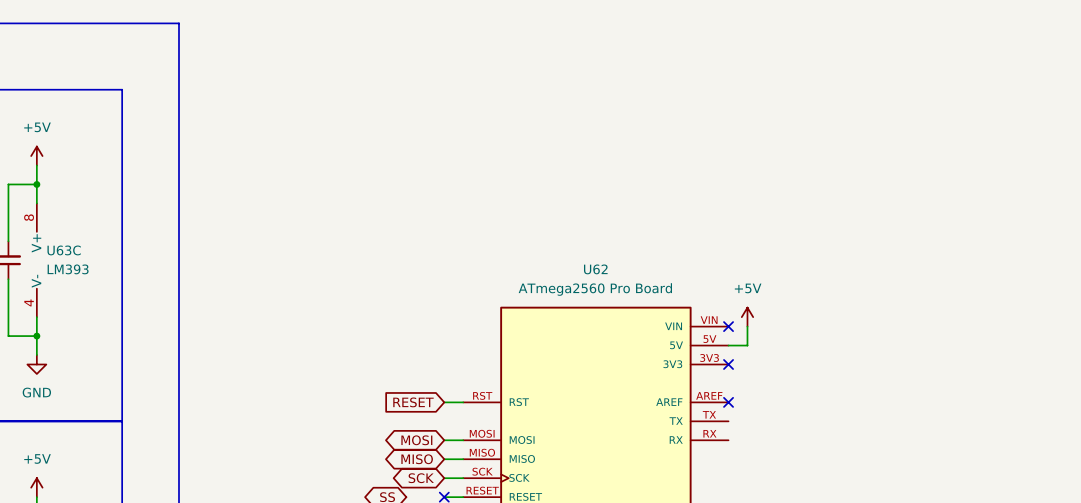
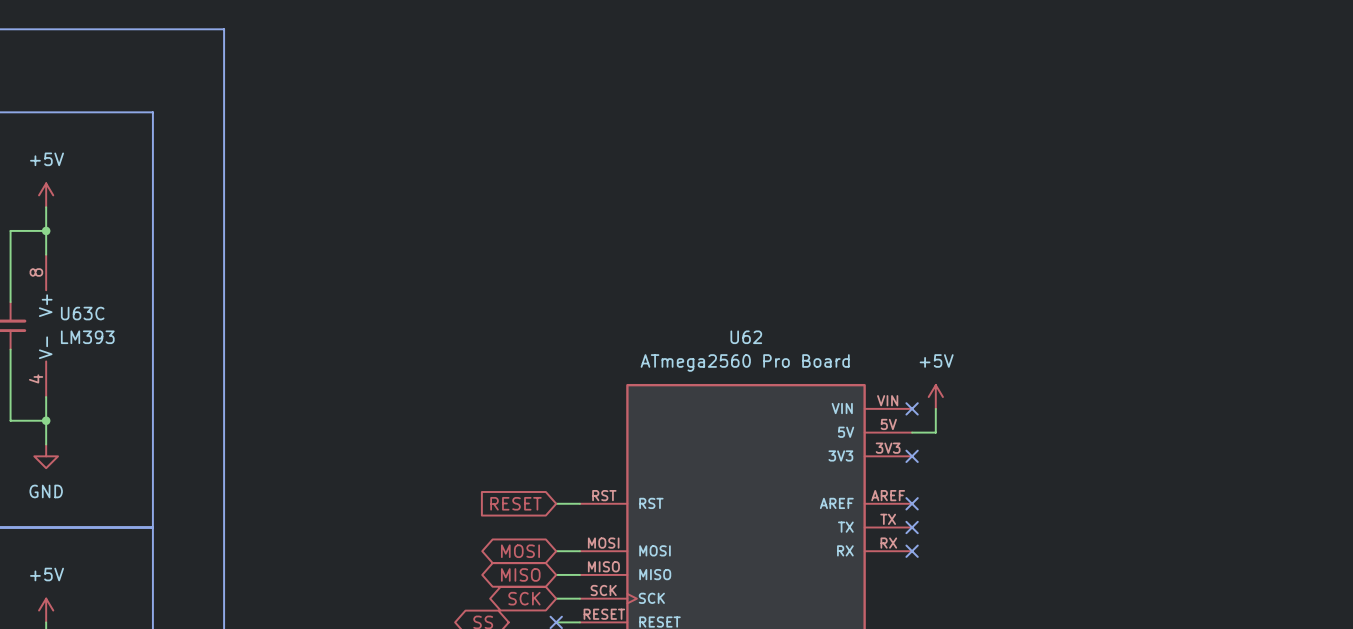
no-connect mark: none -> (912, 527)
no-connect mark: none -> (912, 551)

